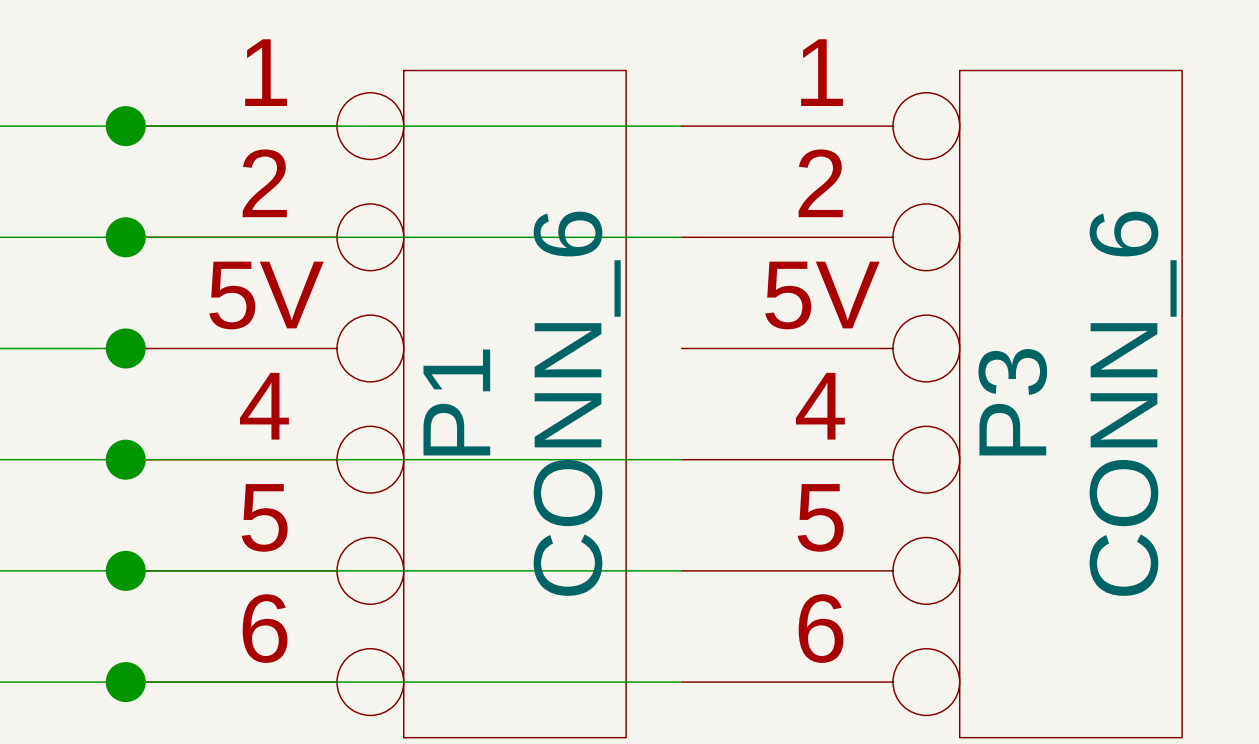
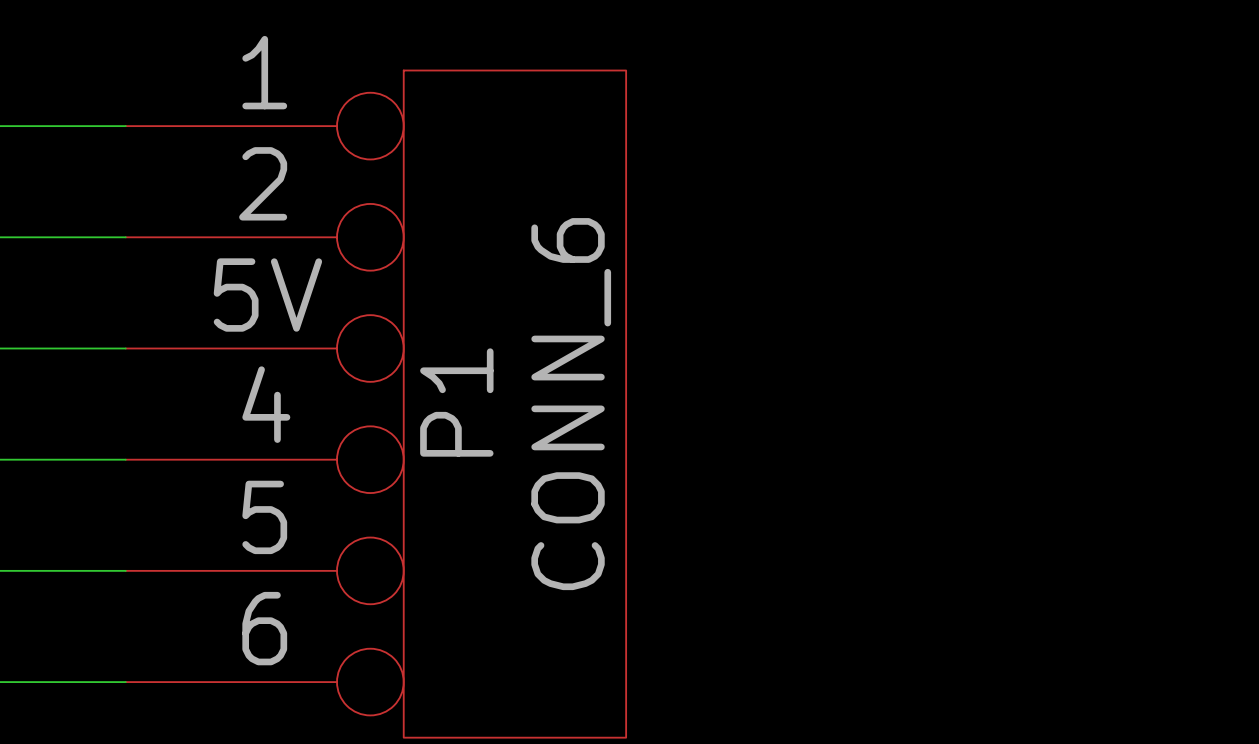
wire: (125, 126) (681, 126) -> none
junction: (125, 126) -> none
wire: (125, 237) (681, 237) -> none
junction: (125, 237) -> none
junction: (125, 348) -> none
P3: CONN_6 (931, 404) -> none
wire: (125, 459) (681, 459) -> none
junction: (125, 459) -> none
wire: (125, 570) (681, 570) -> none
junction: (125, 570) -> none
wire: (125, 682) (681, 682) -> none
junction: (125, 682) -> none

